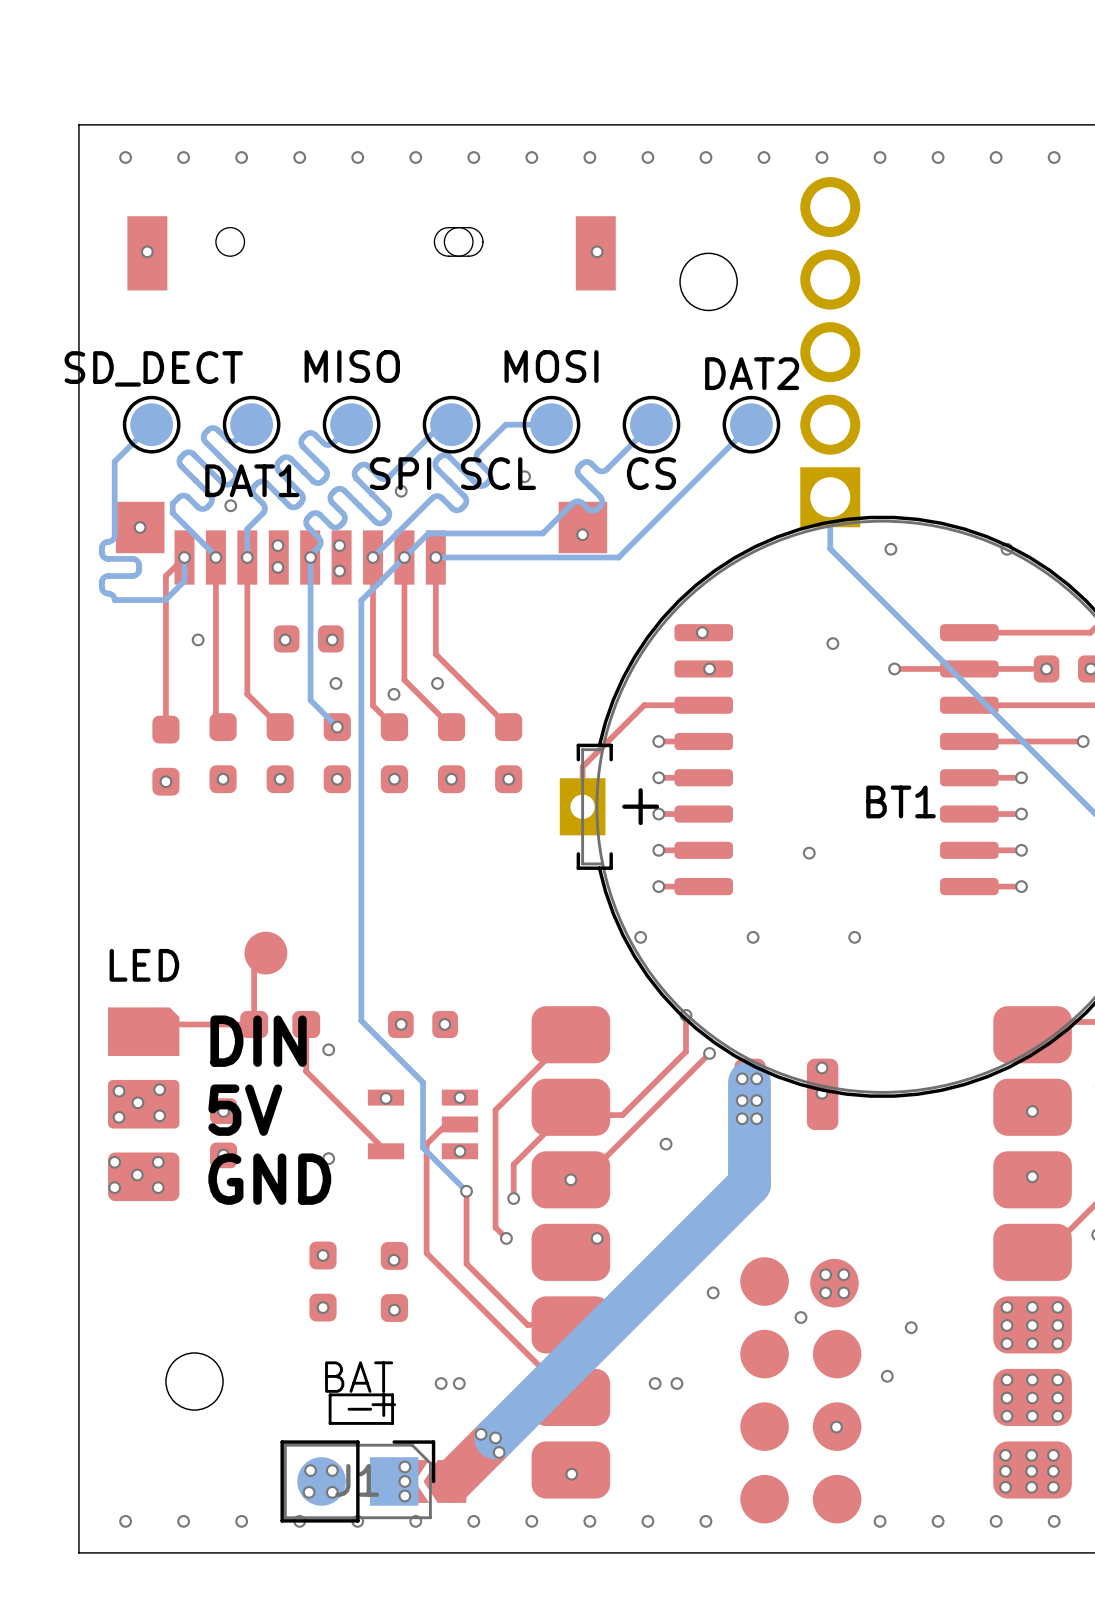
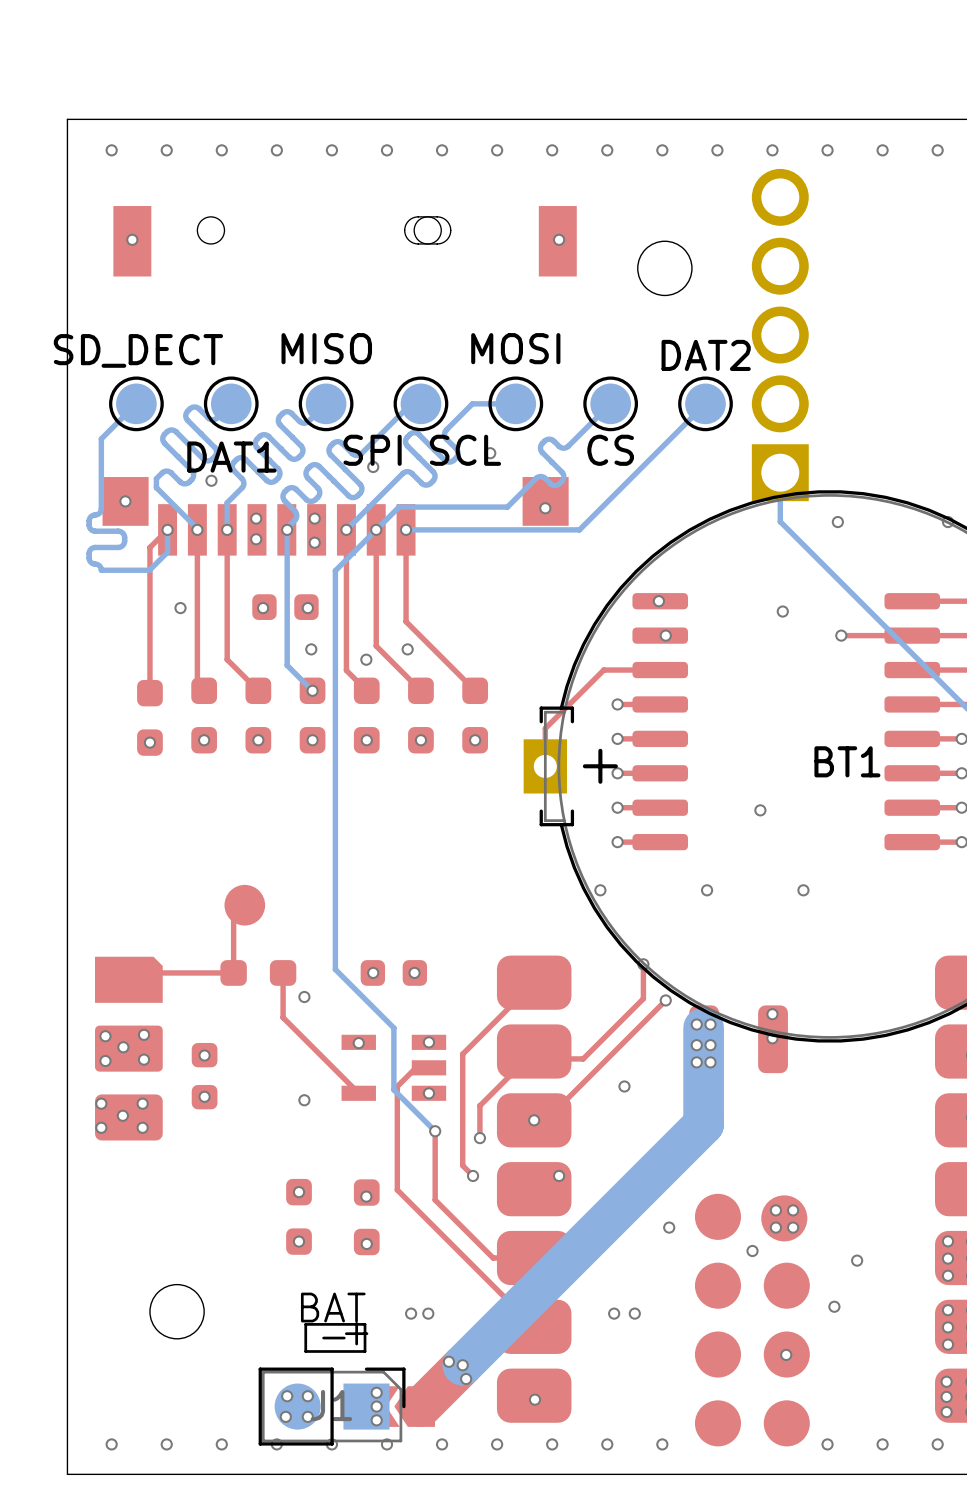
text: LED (144, 965) -> none
text: DIN (258, 1041) -> none
text: 5V (245, 1110) -> none
text: GND (269, 1179) -> none

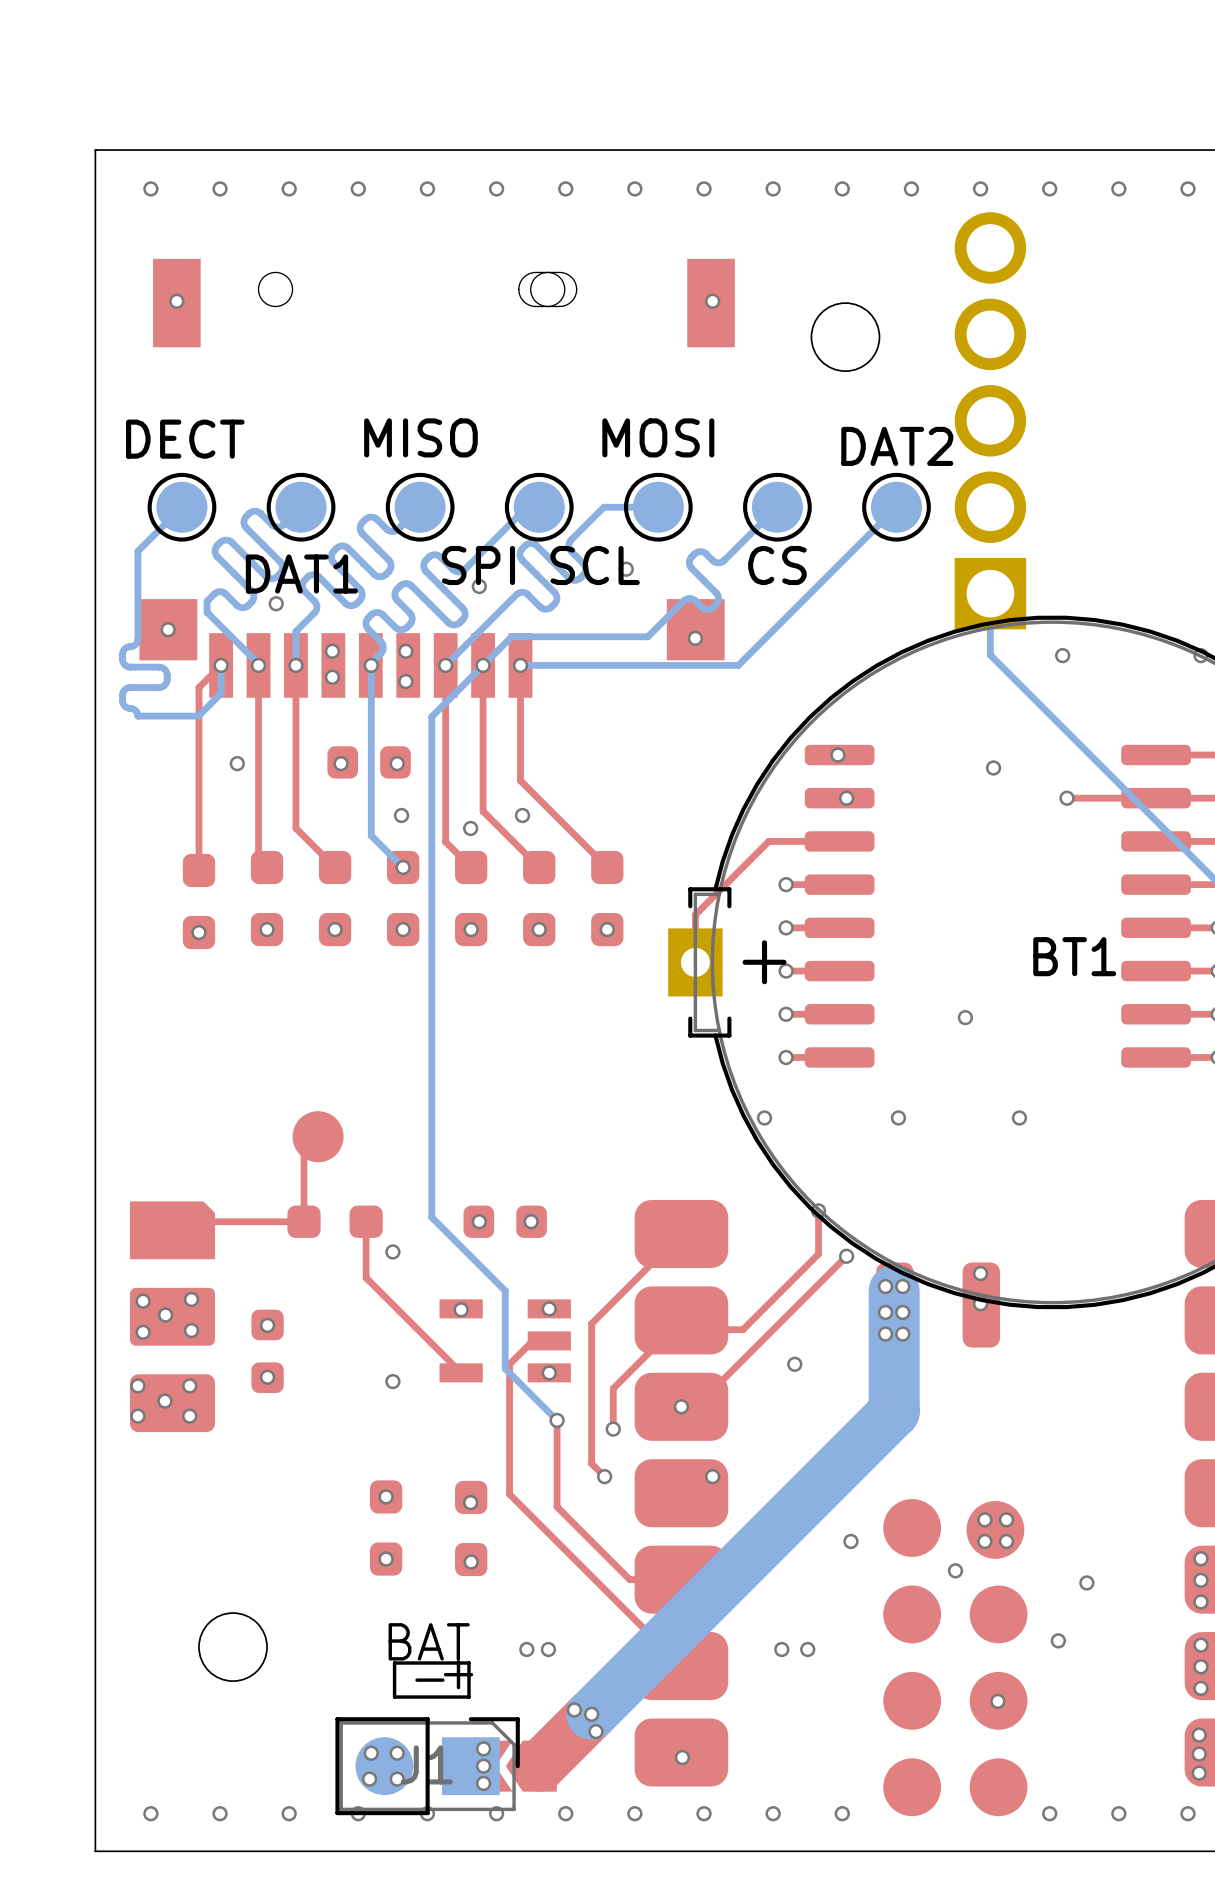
part value: SD_DECT (138, 350) -> DECT (185, 439)

